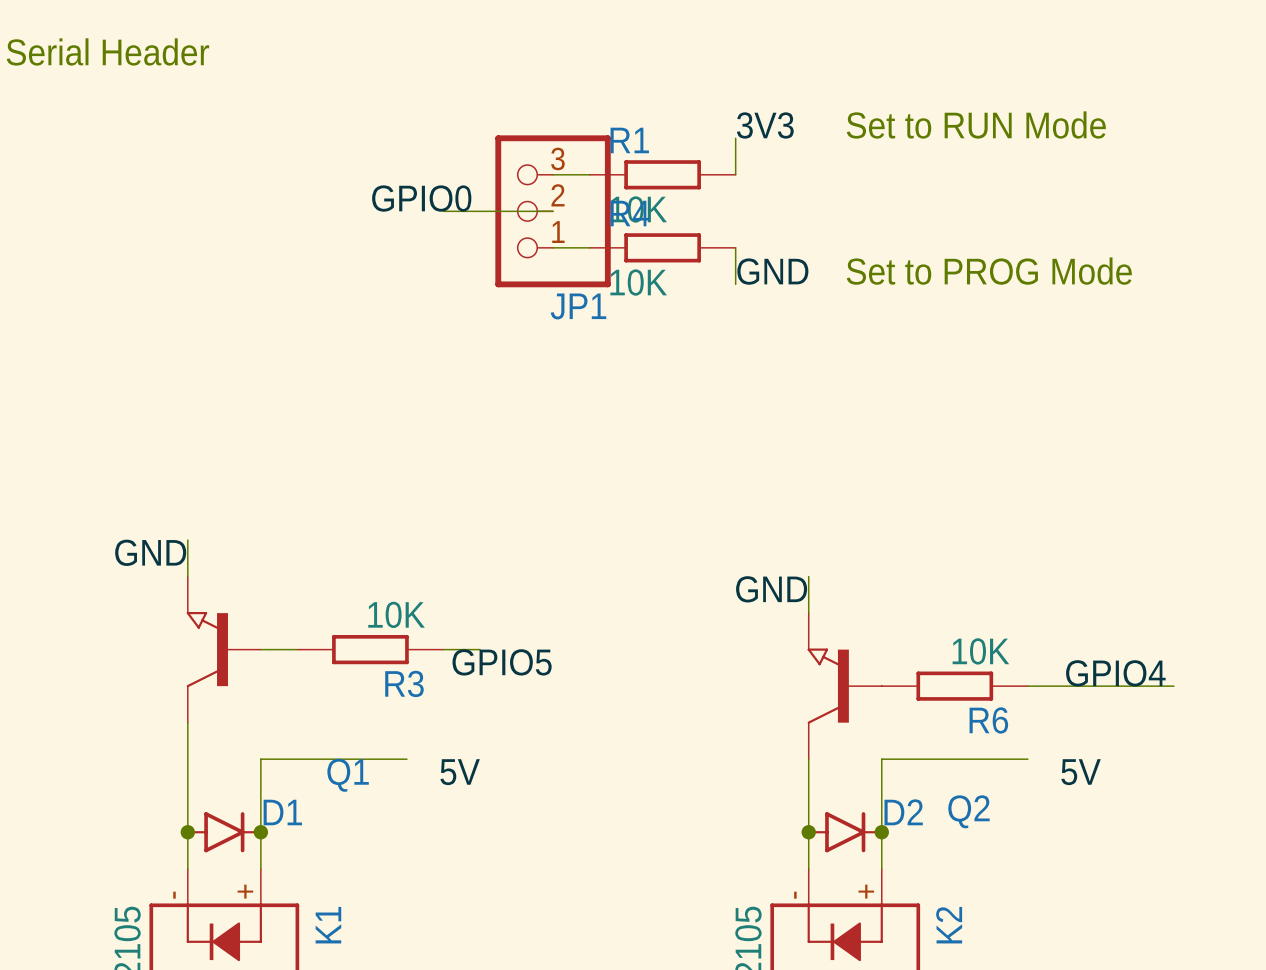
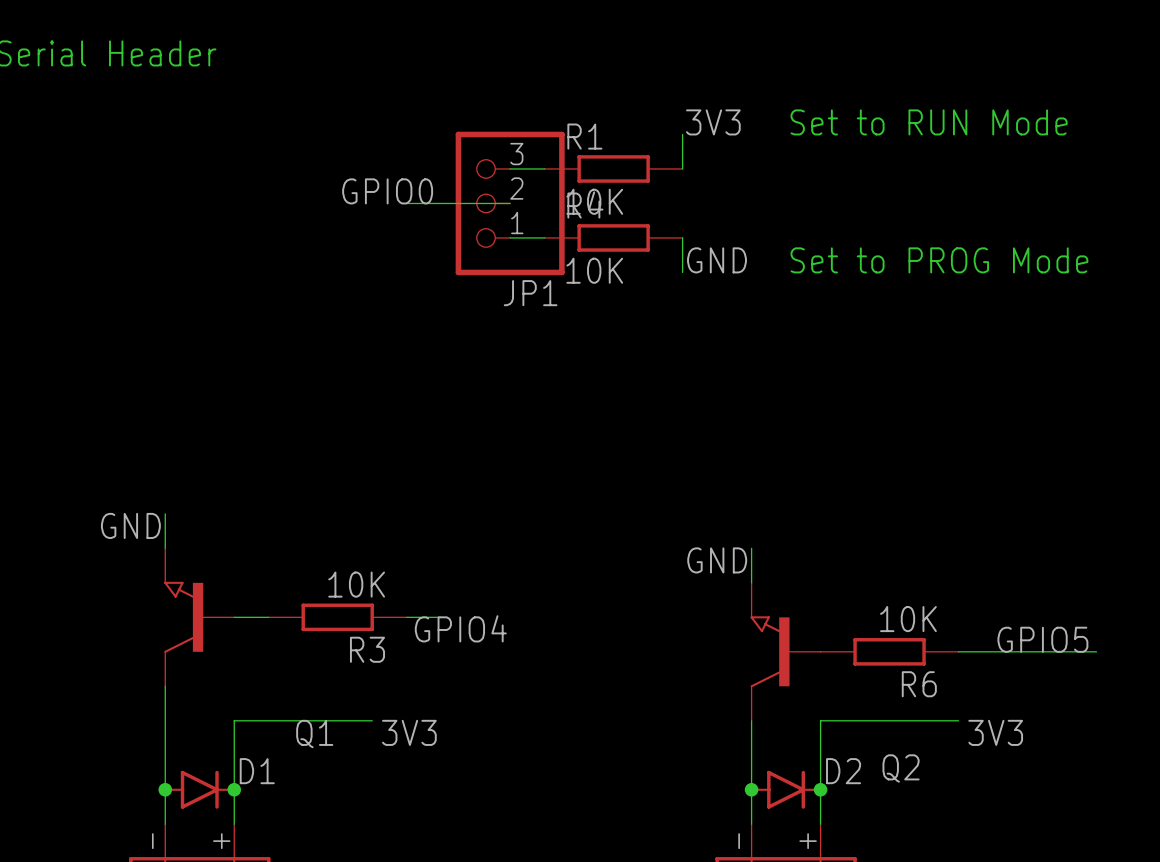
label: GPIO5 (502, 662) -> GPIO4 (460, 628)
label: GPIO4 (1115, 673) -> GPIO5 (1042, 639)
label: 5V (460, 772) -> 3V3 (409, 732)
label: 5V (1081, 772) -> 3V3 (995, 732)

